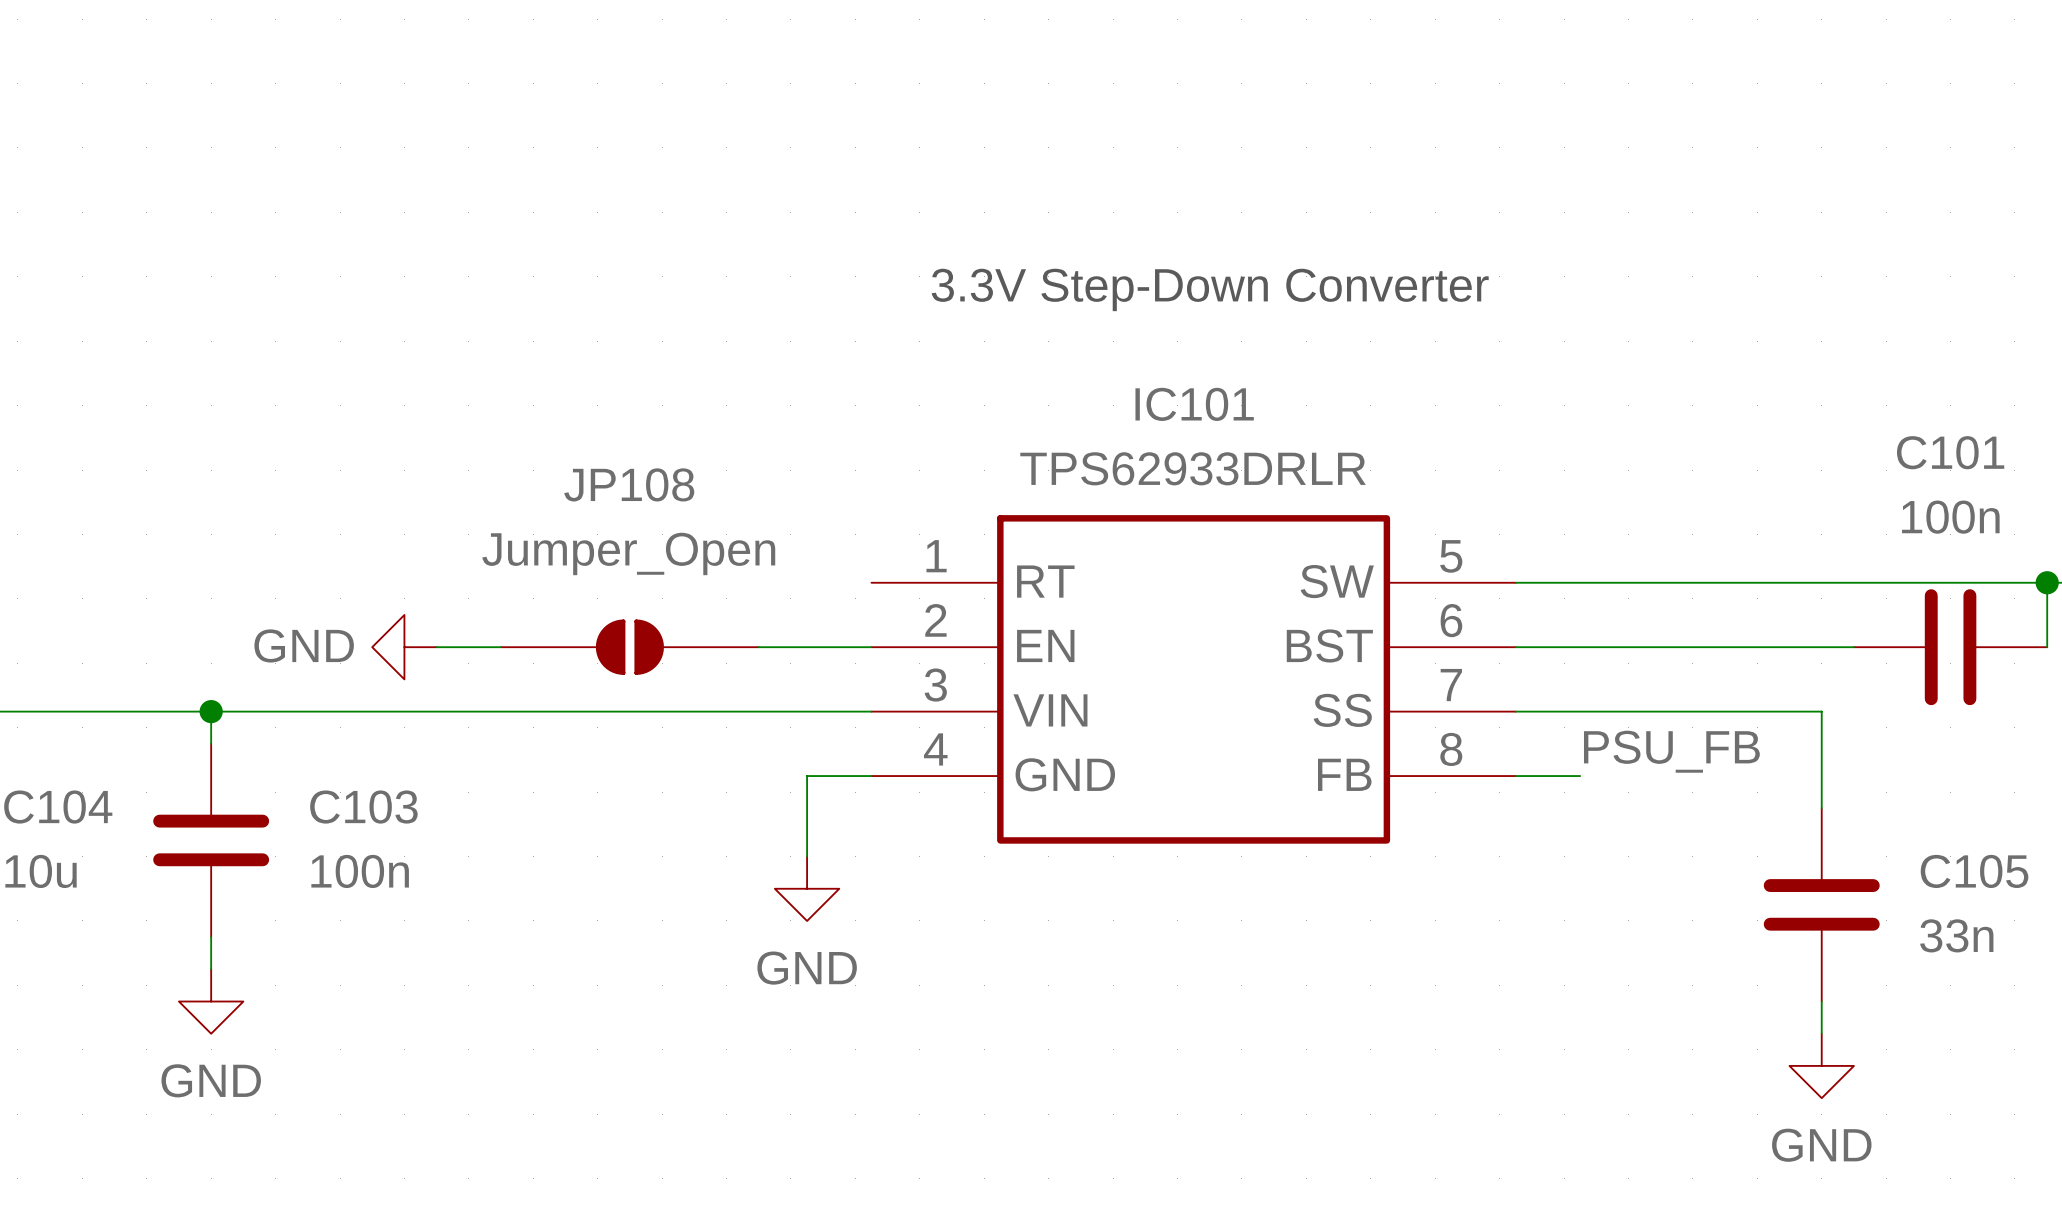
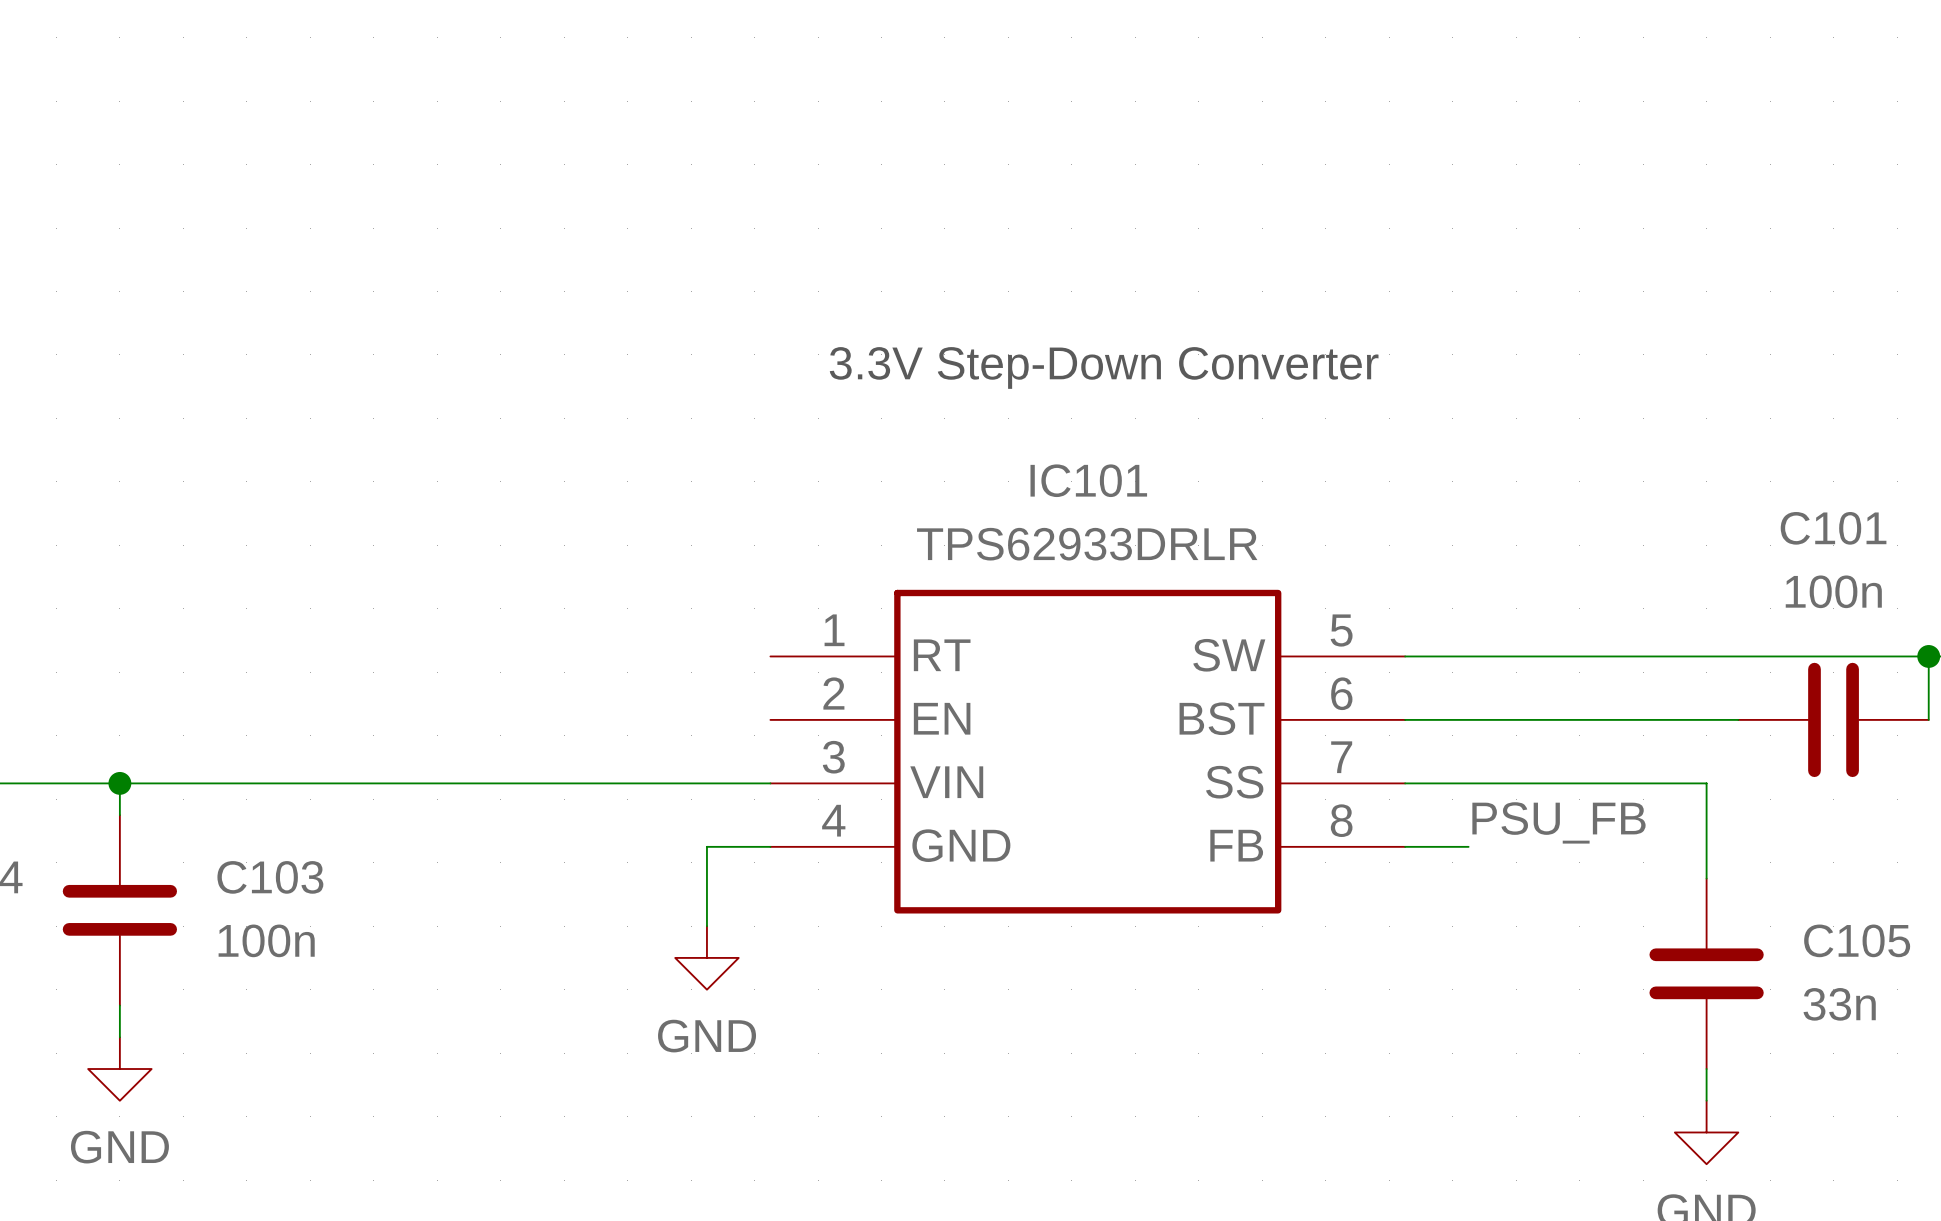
power symbol: GND (404, 647) -> none
wire: (436, 647) (501, 647) -> none
JP108: Jumper_Open (629, 647) -> none
wire: (758, 647) (871, 647) -> none

